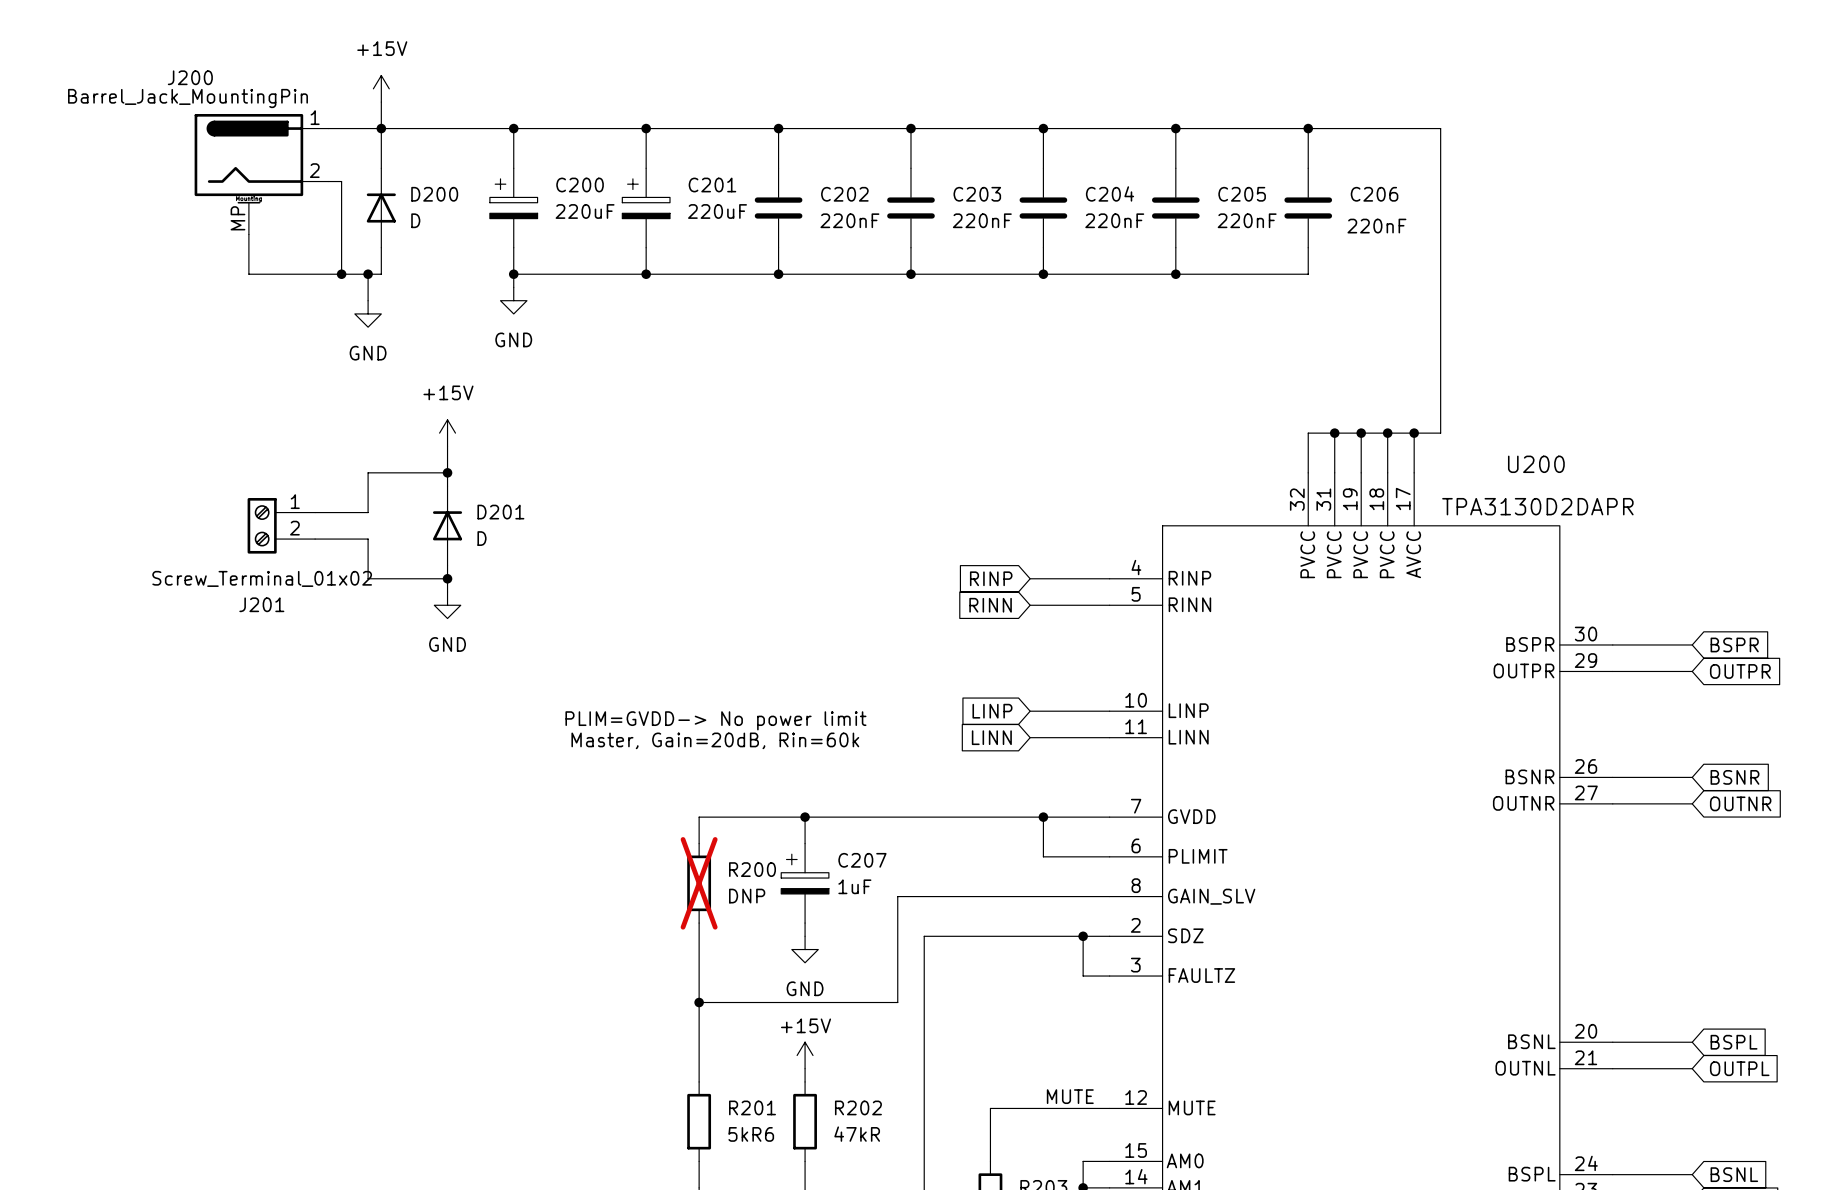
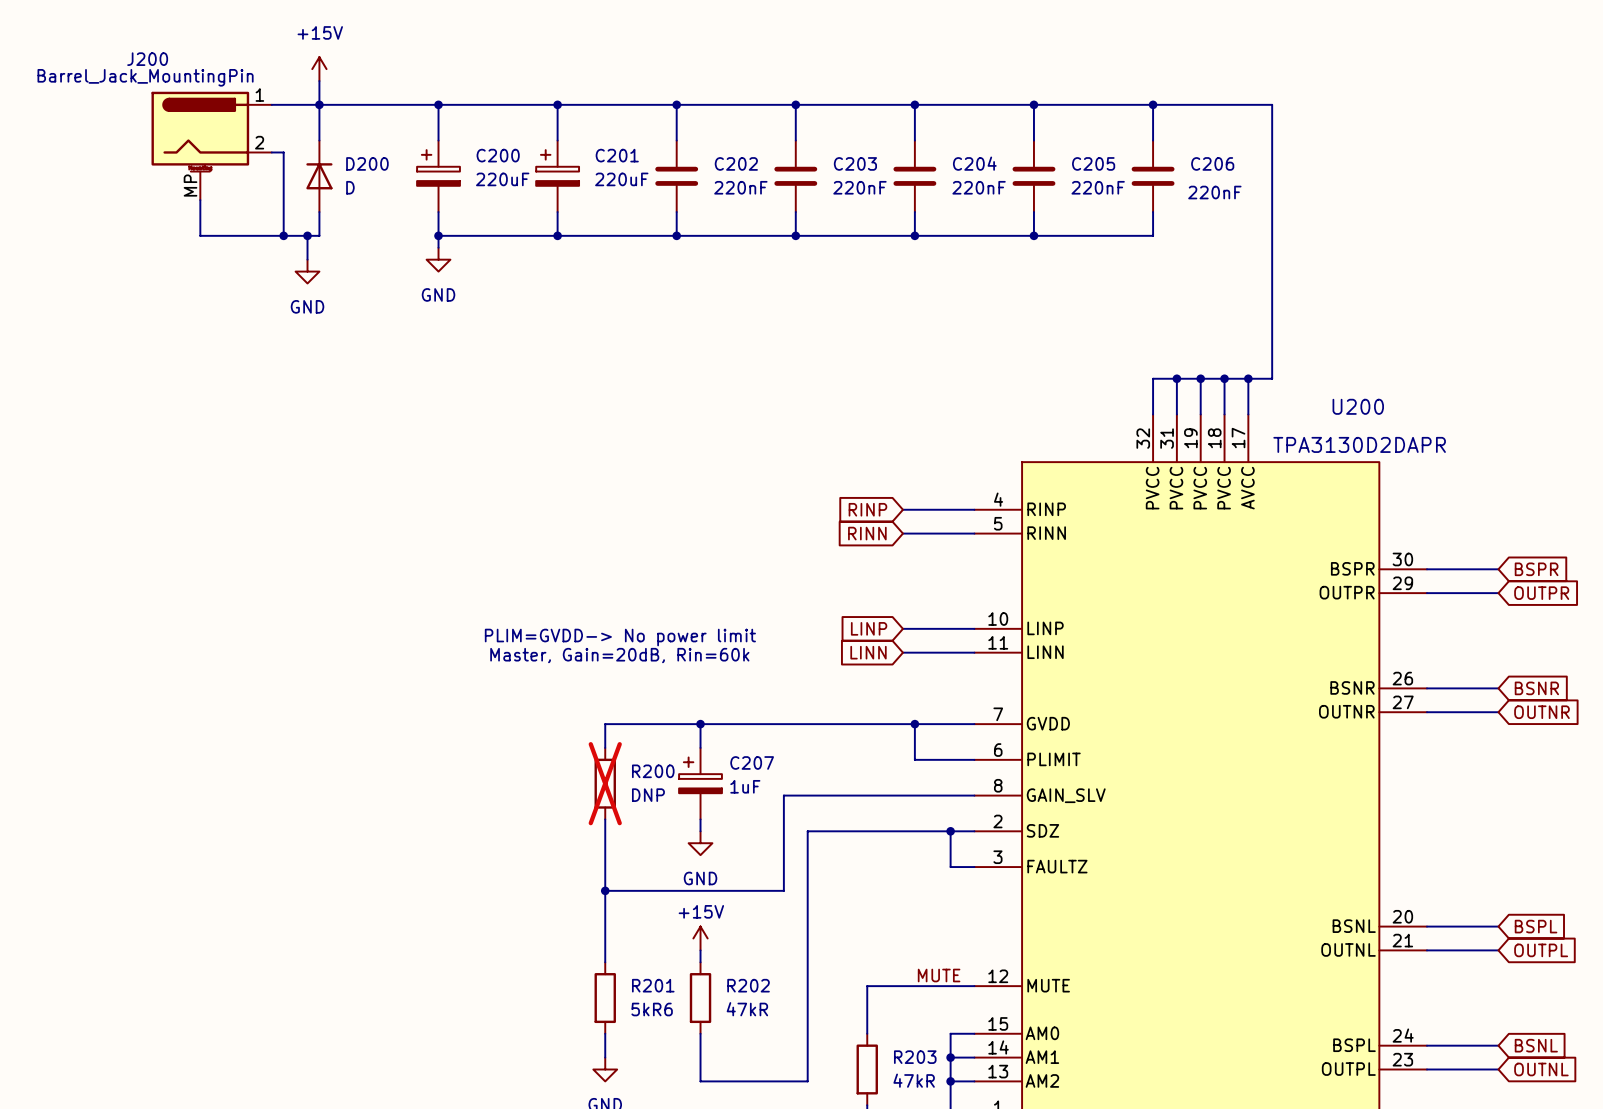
power symbol: +15V (447, 433) -> none
wire: (447, 446) (447, 486) -> none
wire: (447, 472) (368, 472) (368, 512) (315, 512) -> none
junction: (447, 472) -> none
J201: Screw_Terminal_01x02 (281, 525) -> none
D201: D (447, 525) -> none
wire: (315, 539) (368, 539) (368, 578) (447, 578) -> none
wire: (447, 565) (447, 592) -> none
junction: (447, 578) -> none
power symbol: GND (447, 605) -> none

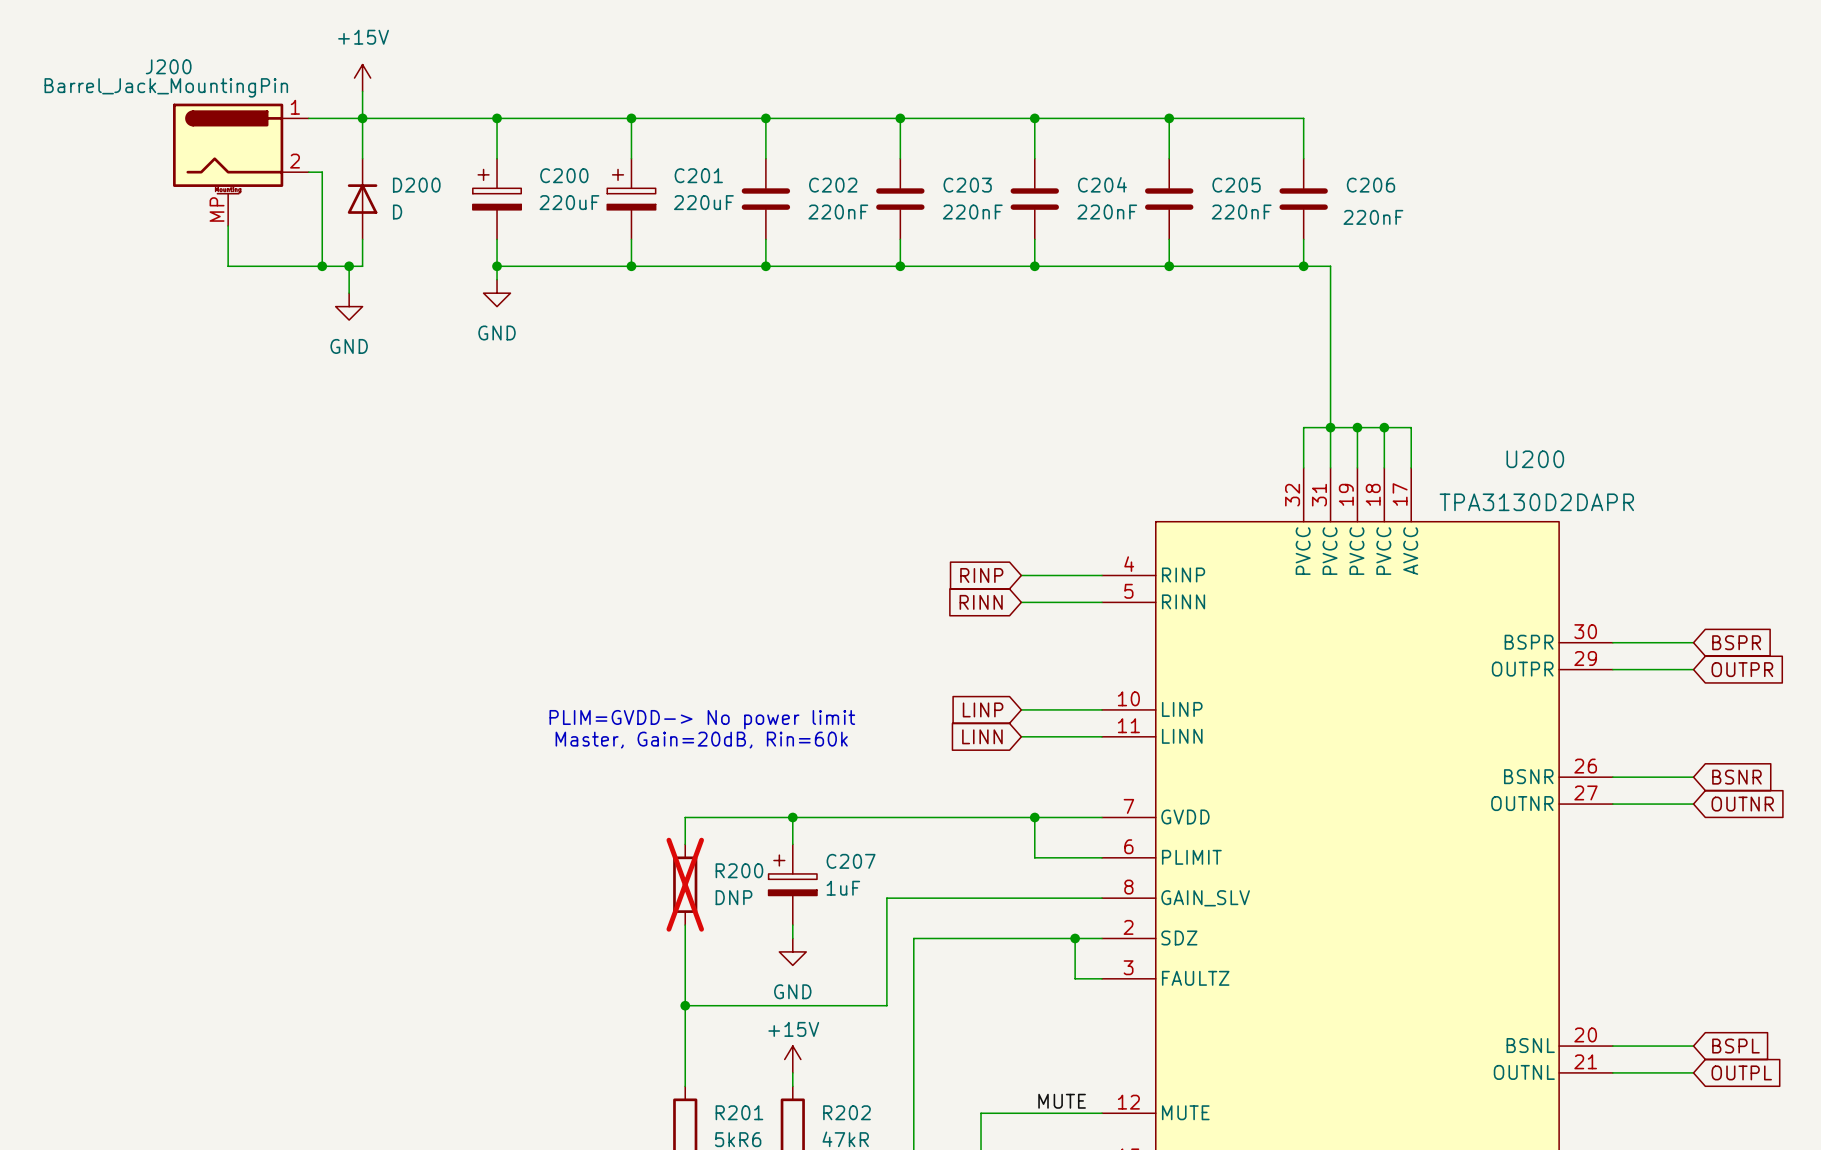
wire: (1153, 104) (1272, 104) (1272, 378) (1248, 378) -> none
junction: (1153, 104) -> none
wire: none -> (1303, 266) (1330, 266) (1330, 427)
junction: none -> (1303, 266)
junction: (1248, 378) -> none

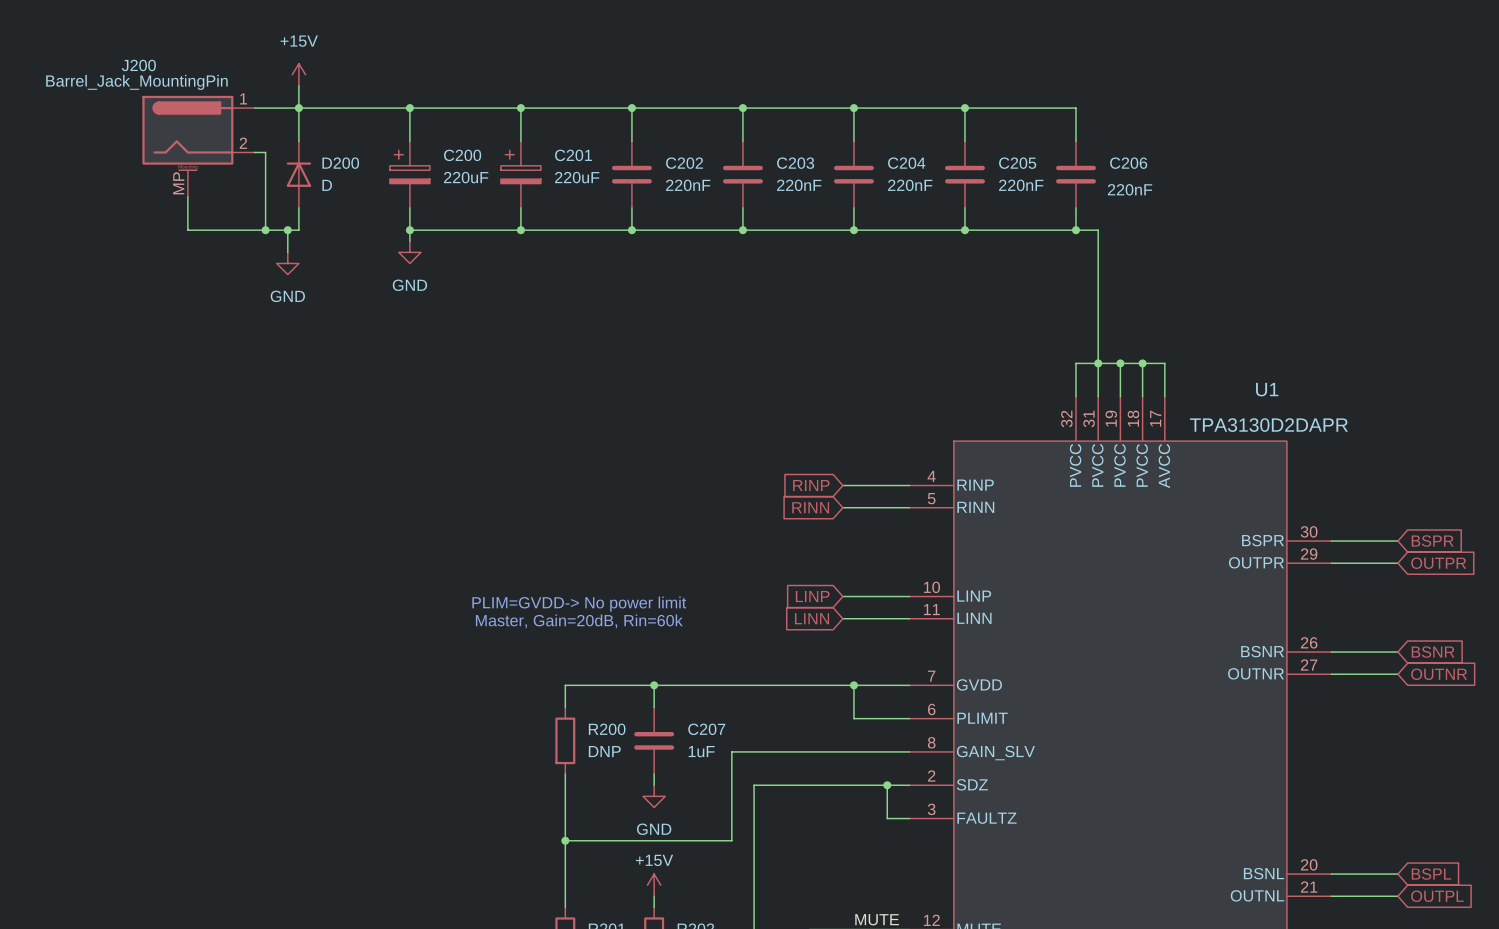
U200 name: U200 (1535, 459) -> U1 (1267, 389)
C207 symbol: [768, 844, 817, 926] -> [634, 707, 675, 775]
R200 do-not-place cross: (685, 884) -> none

